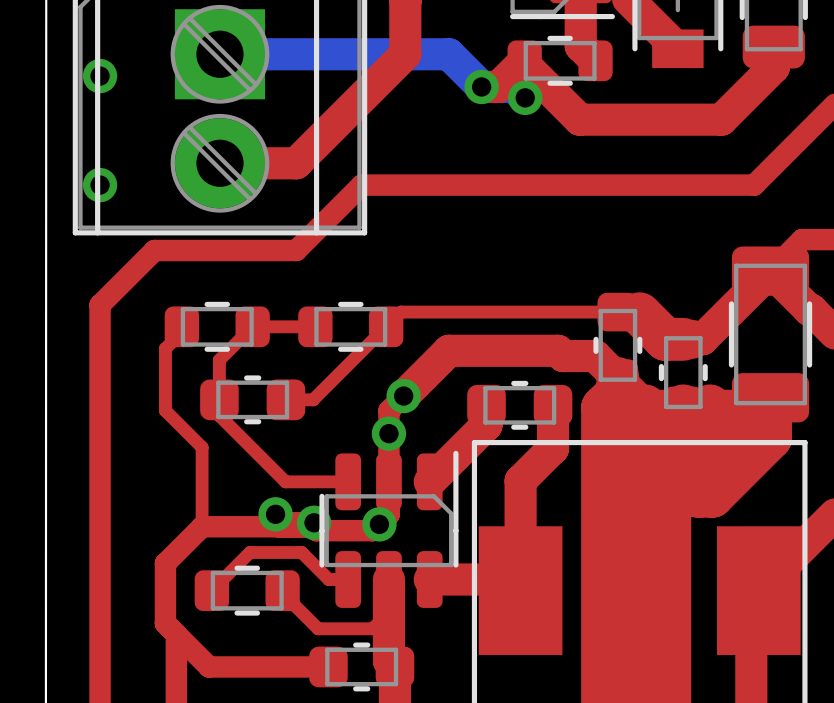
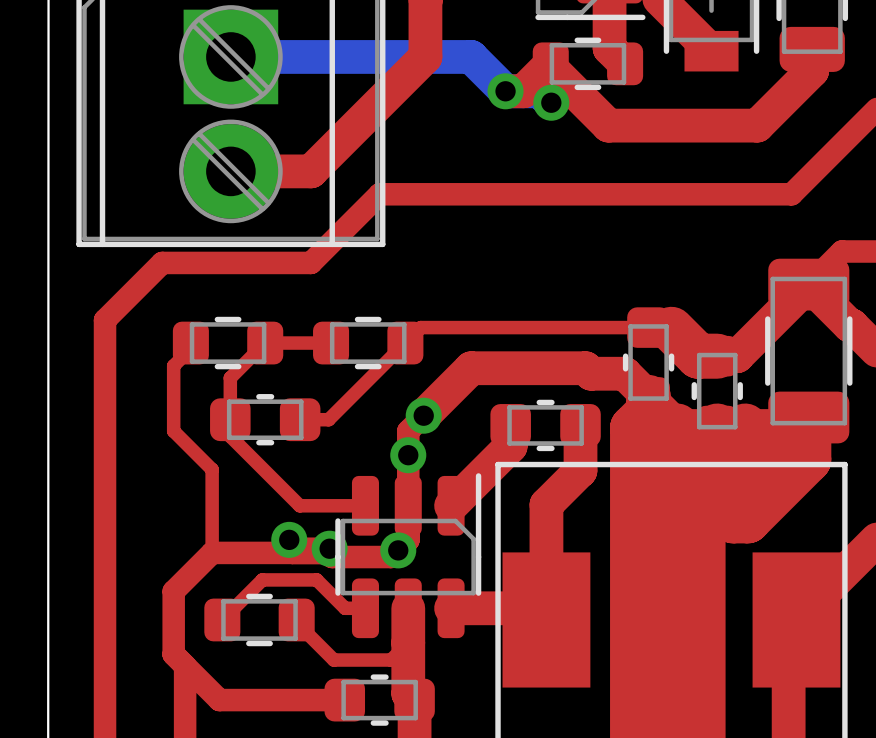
via: (100, 76) -> none
via: (100, 185) -> none

